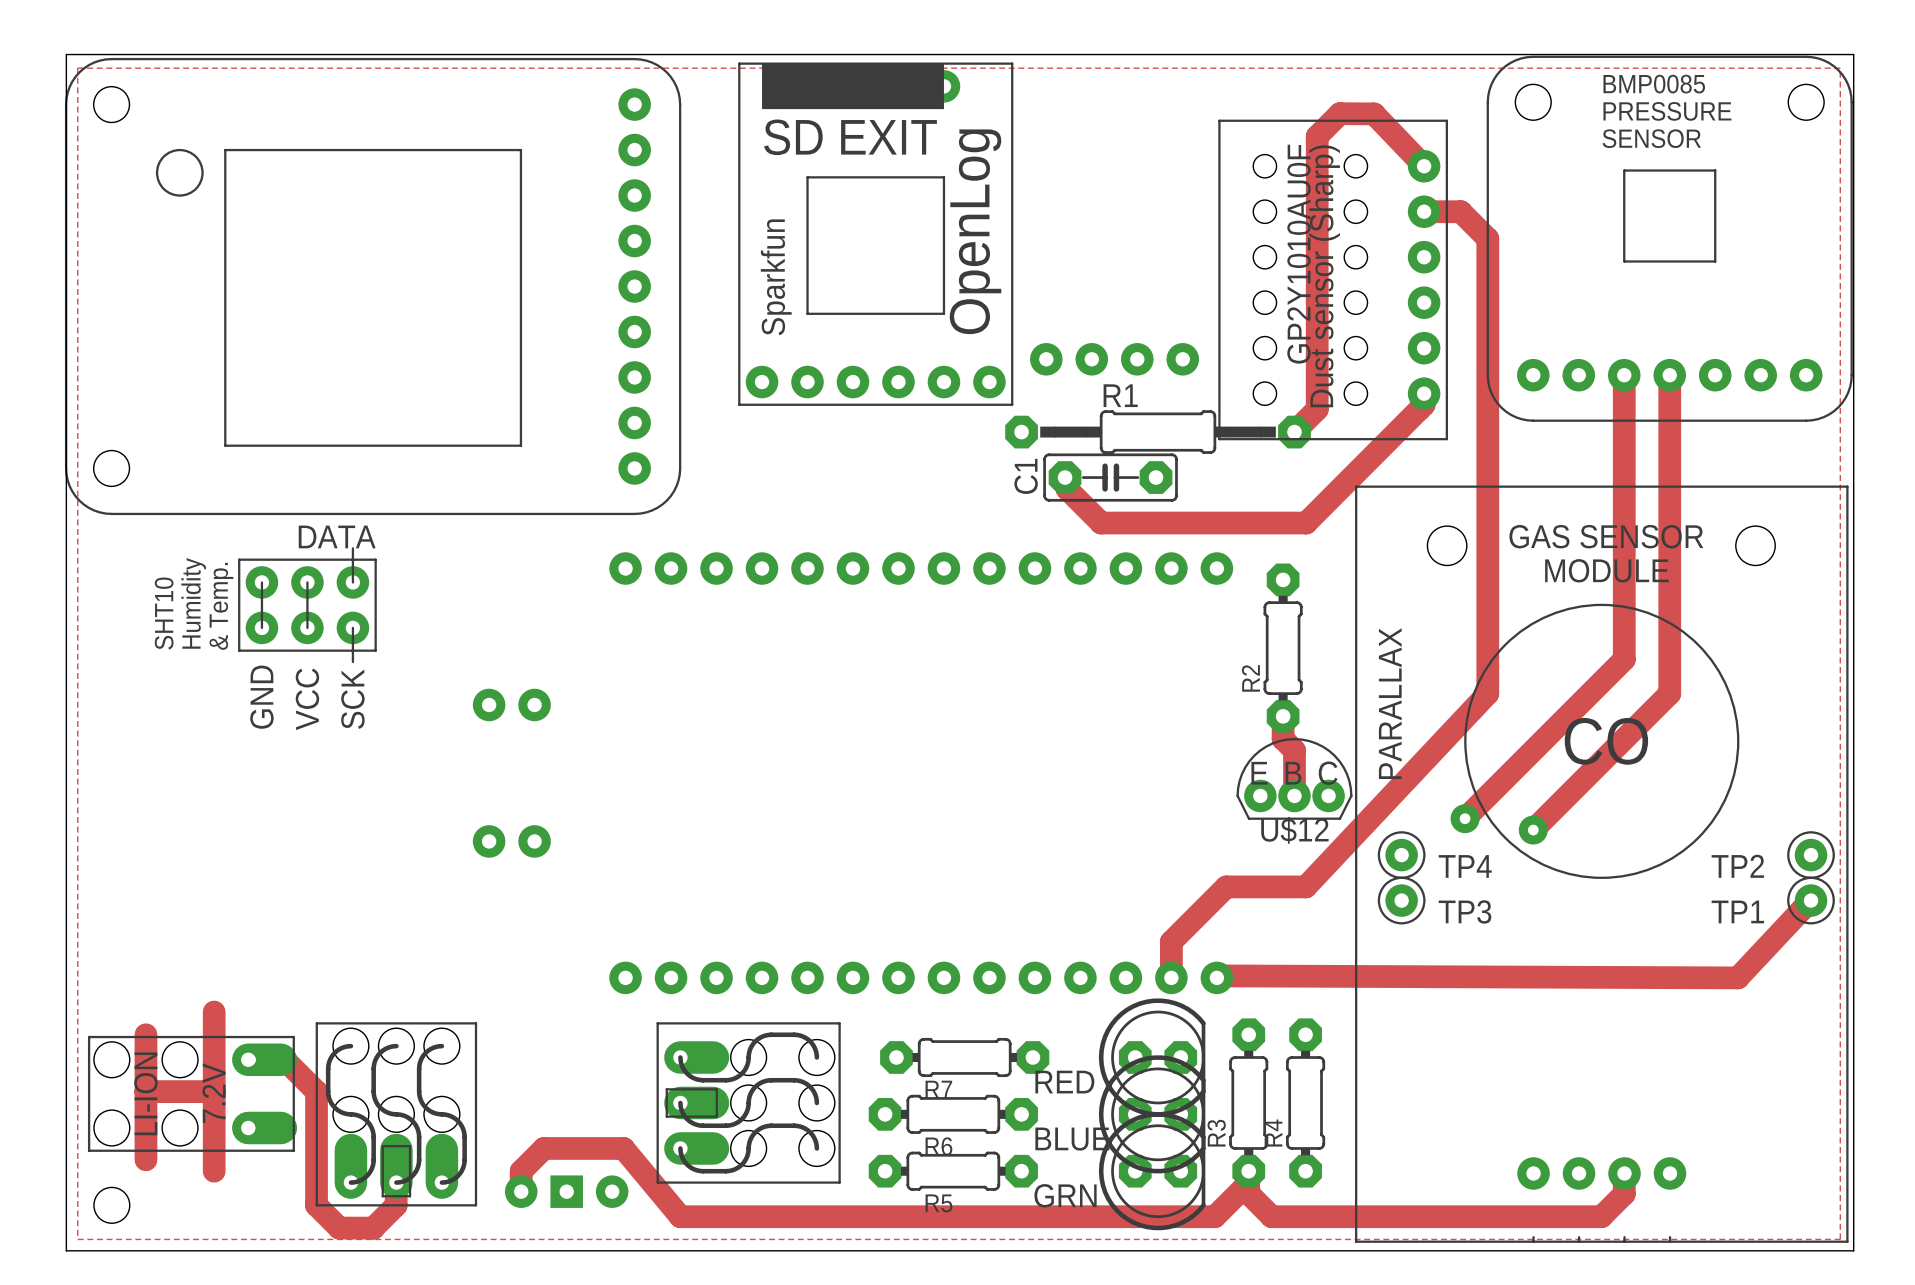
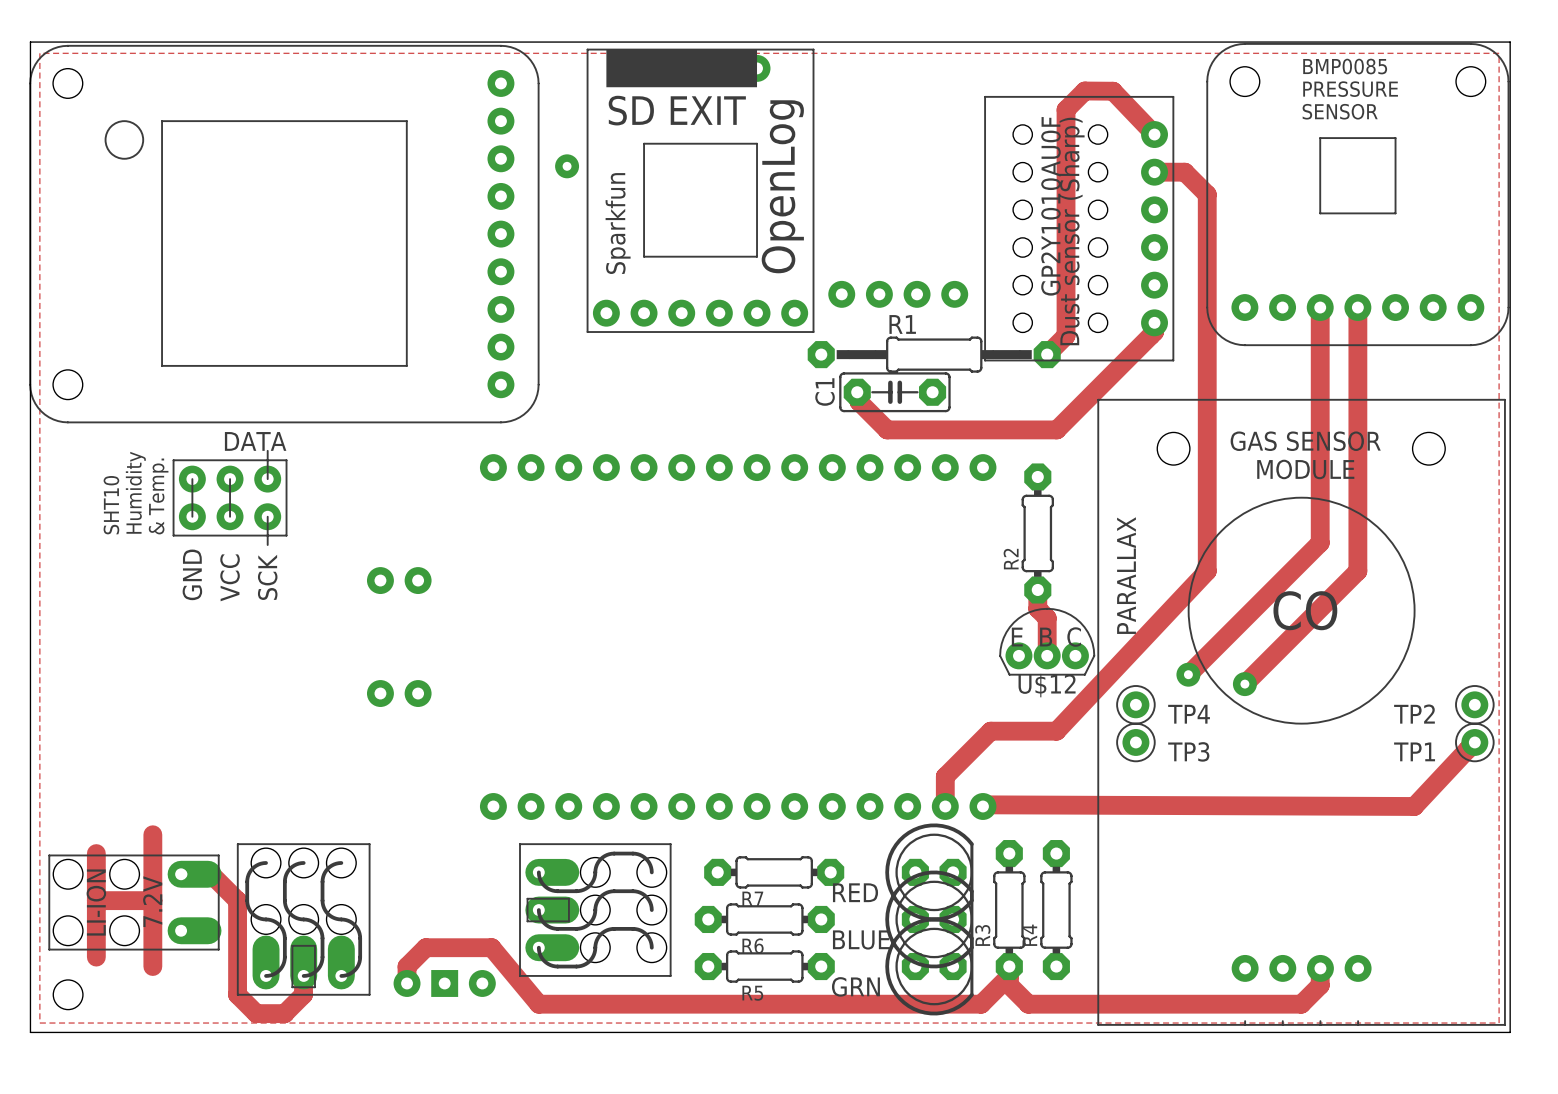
via: none -> (567, 166)

